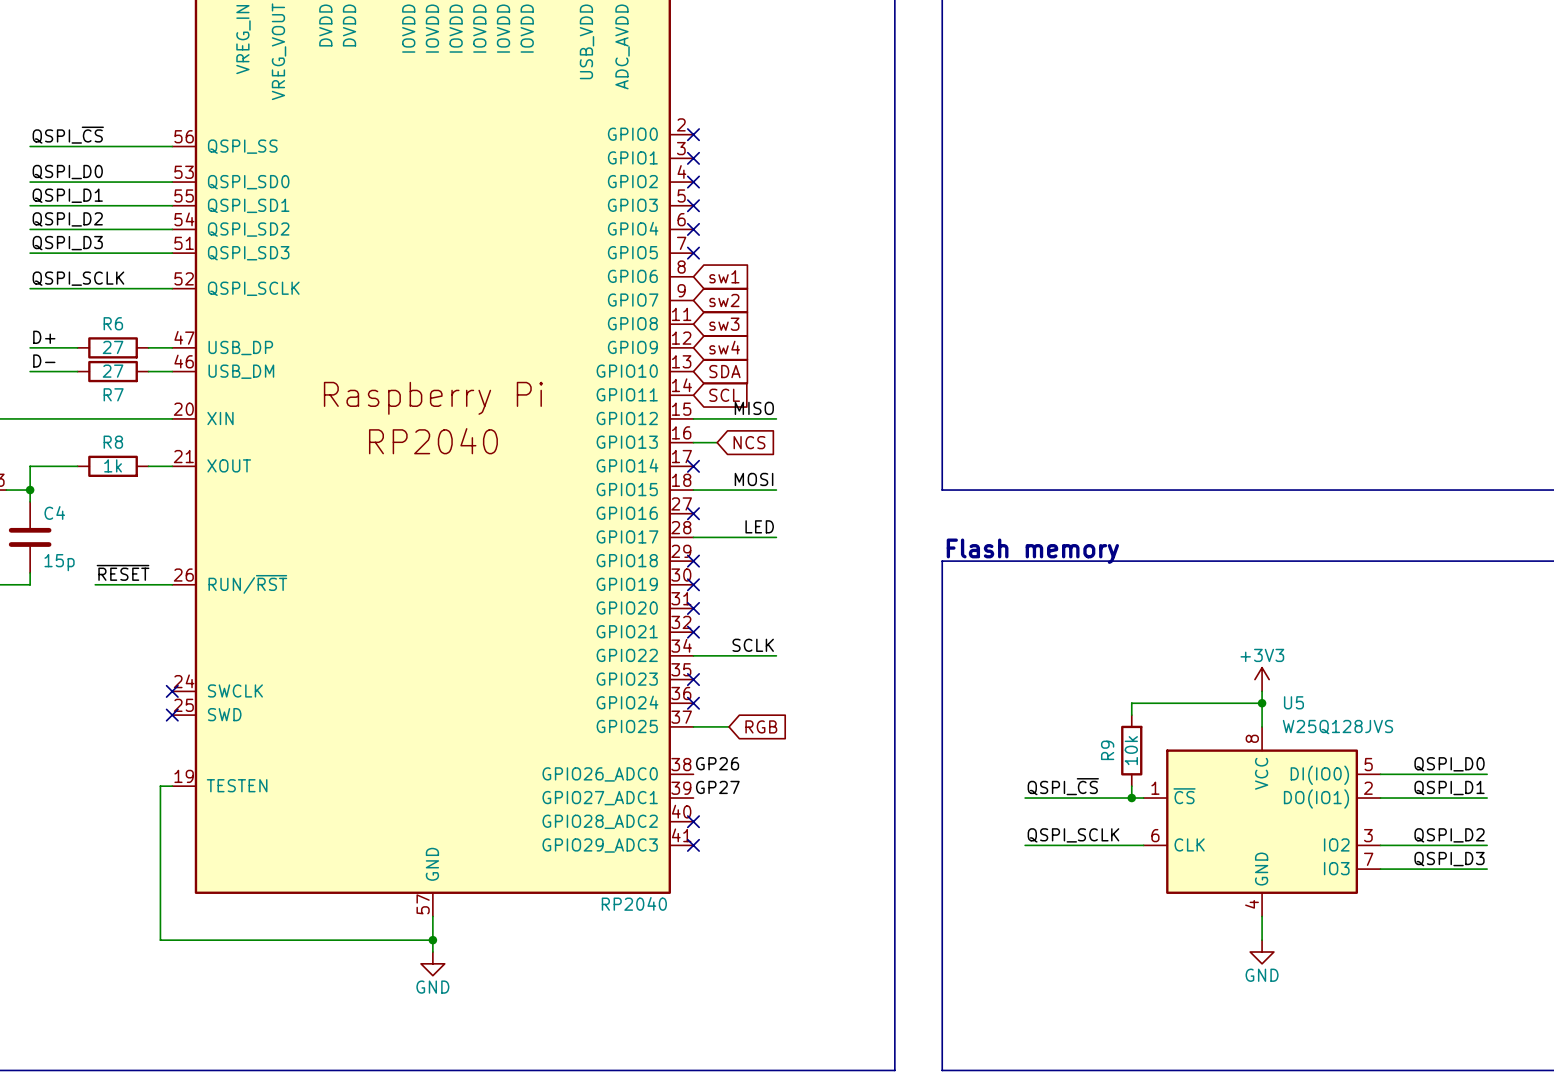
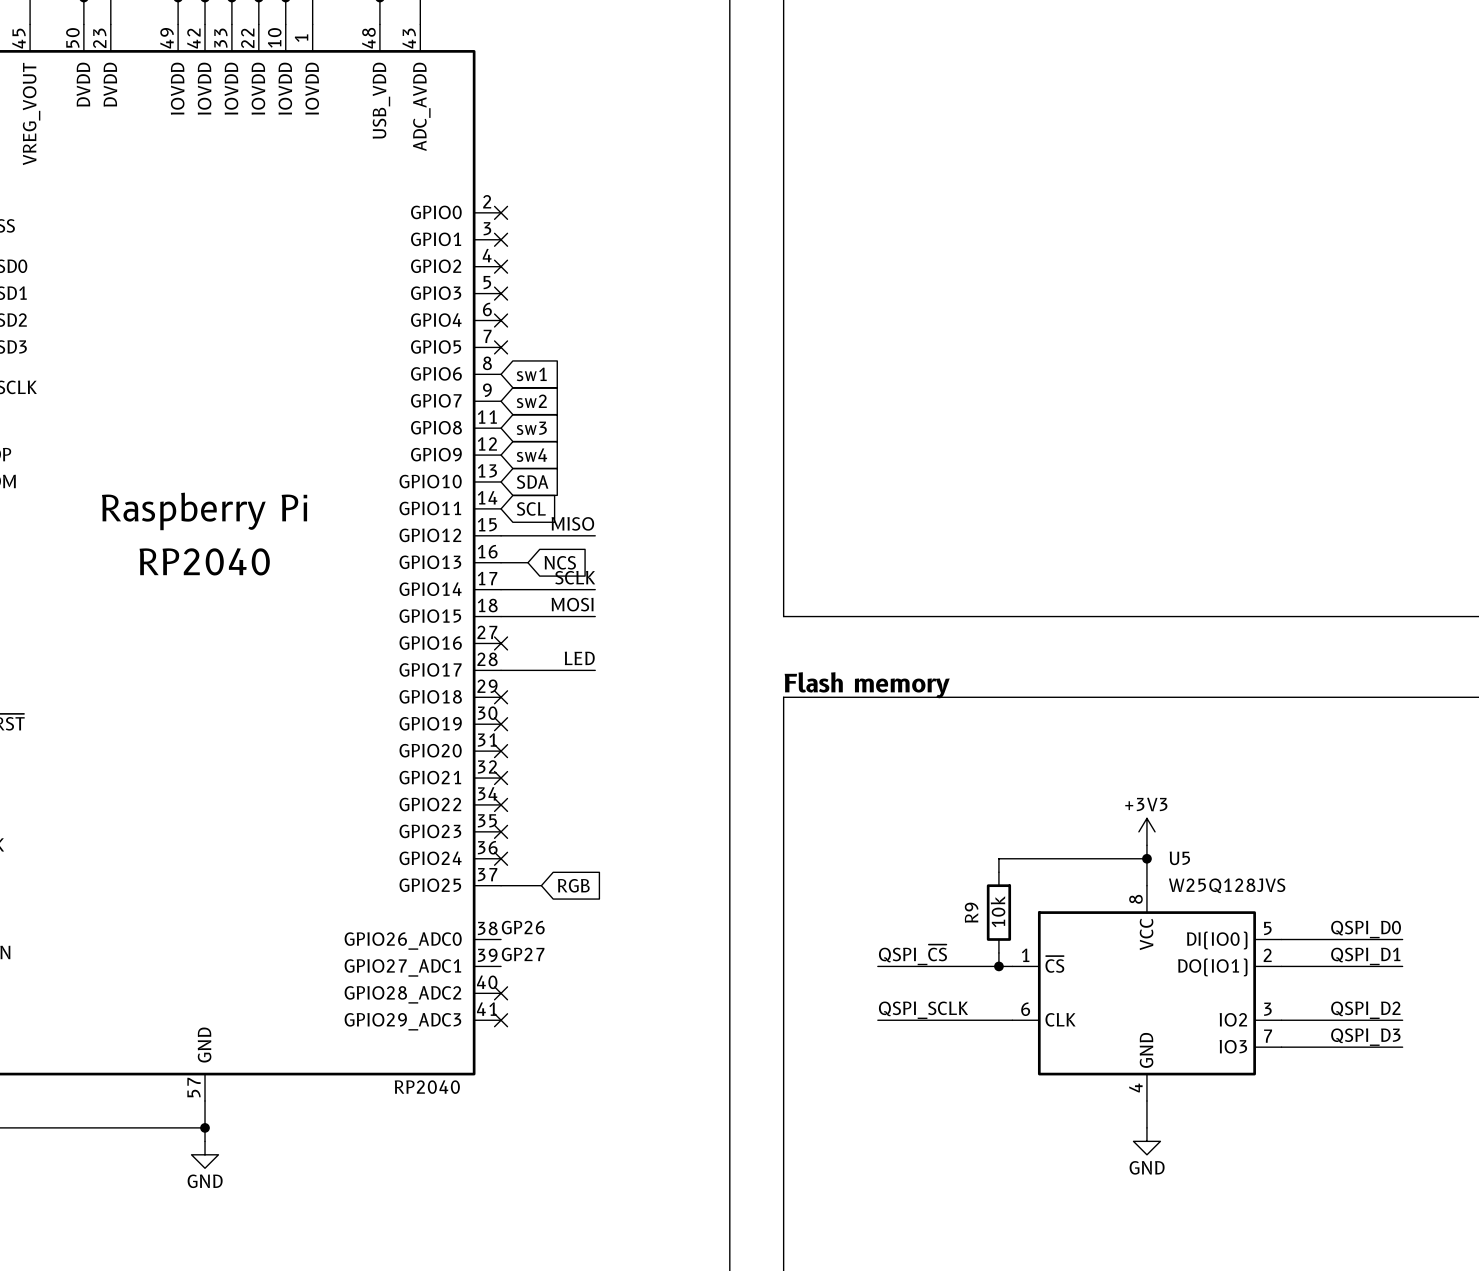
no-connect mark: (693, 466) -> none
label position: SCLK (753, 645) -> SCLK (575, 577)
wire: (693, 655) (776, 655) -> (501, 589) (595, 589)
no-connect mark: none -> (501, 804)

